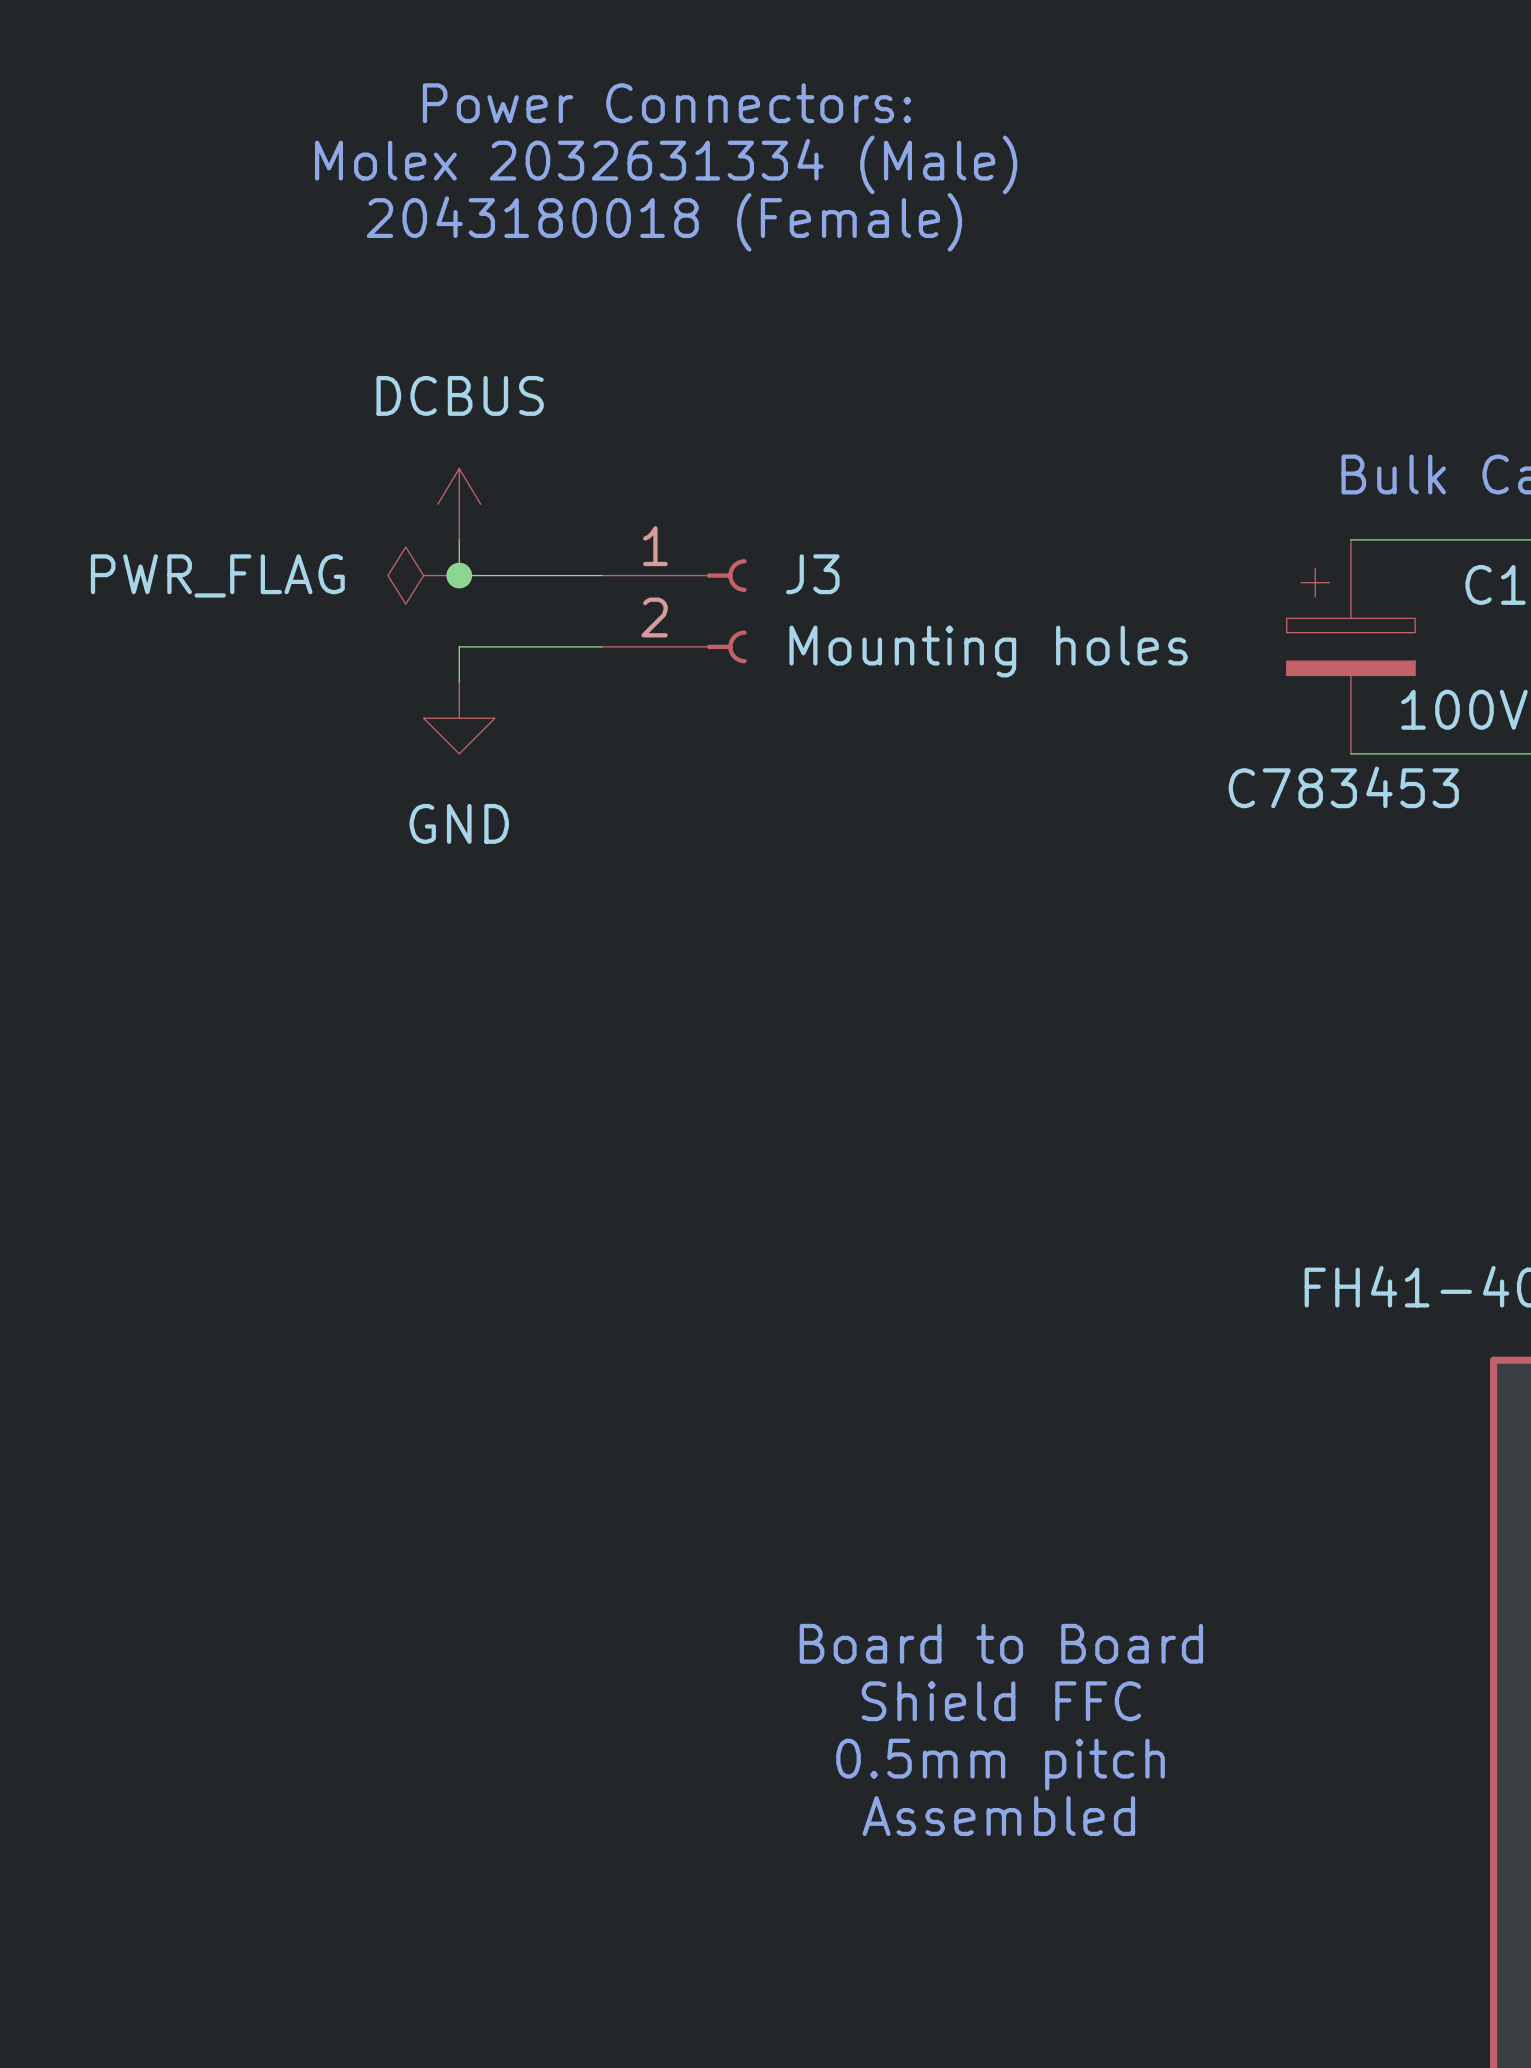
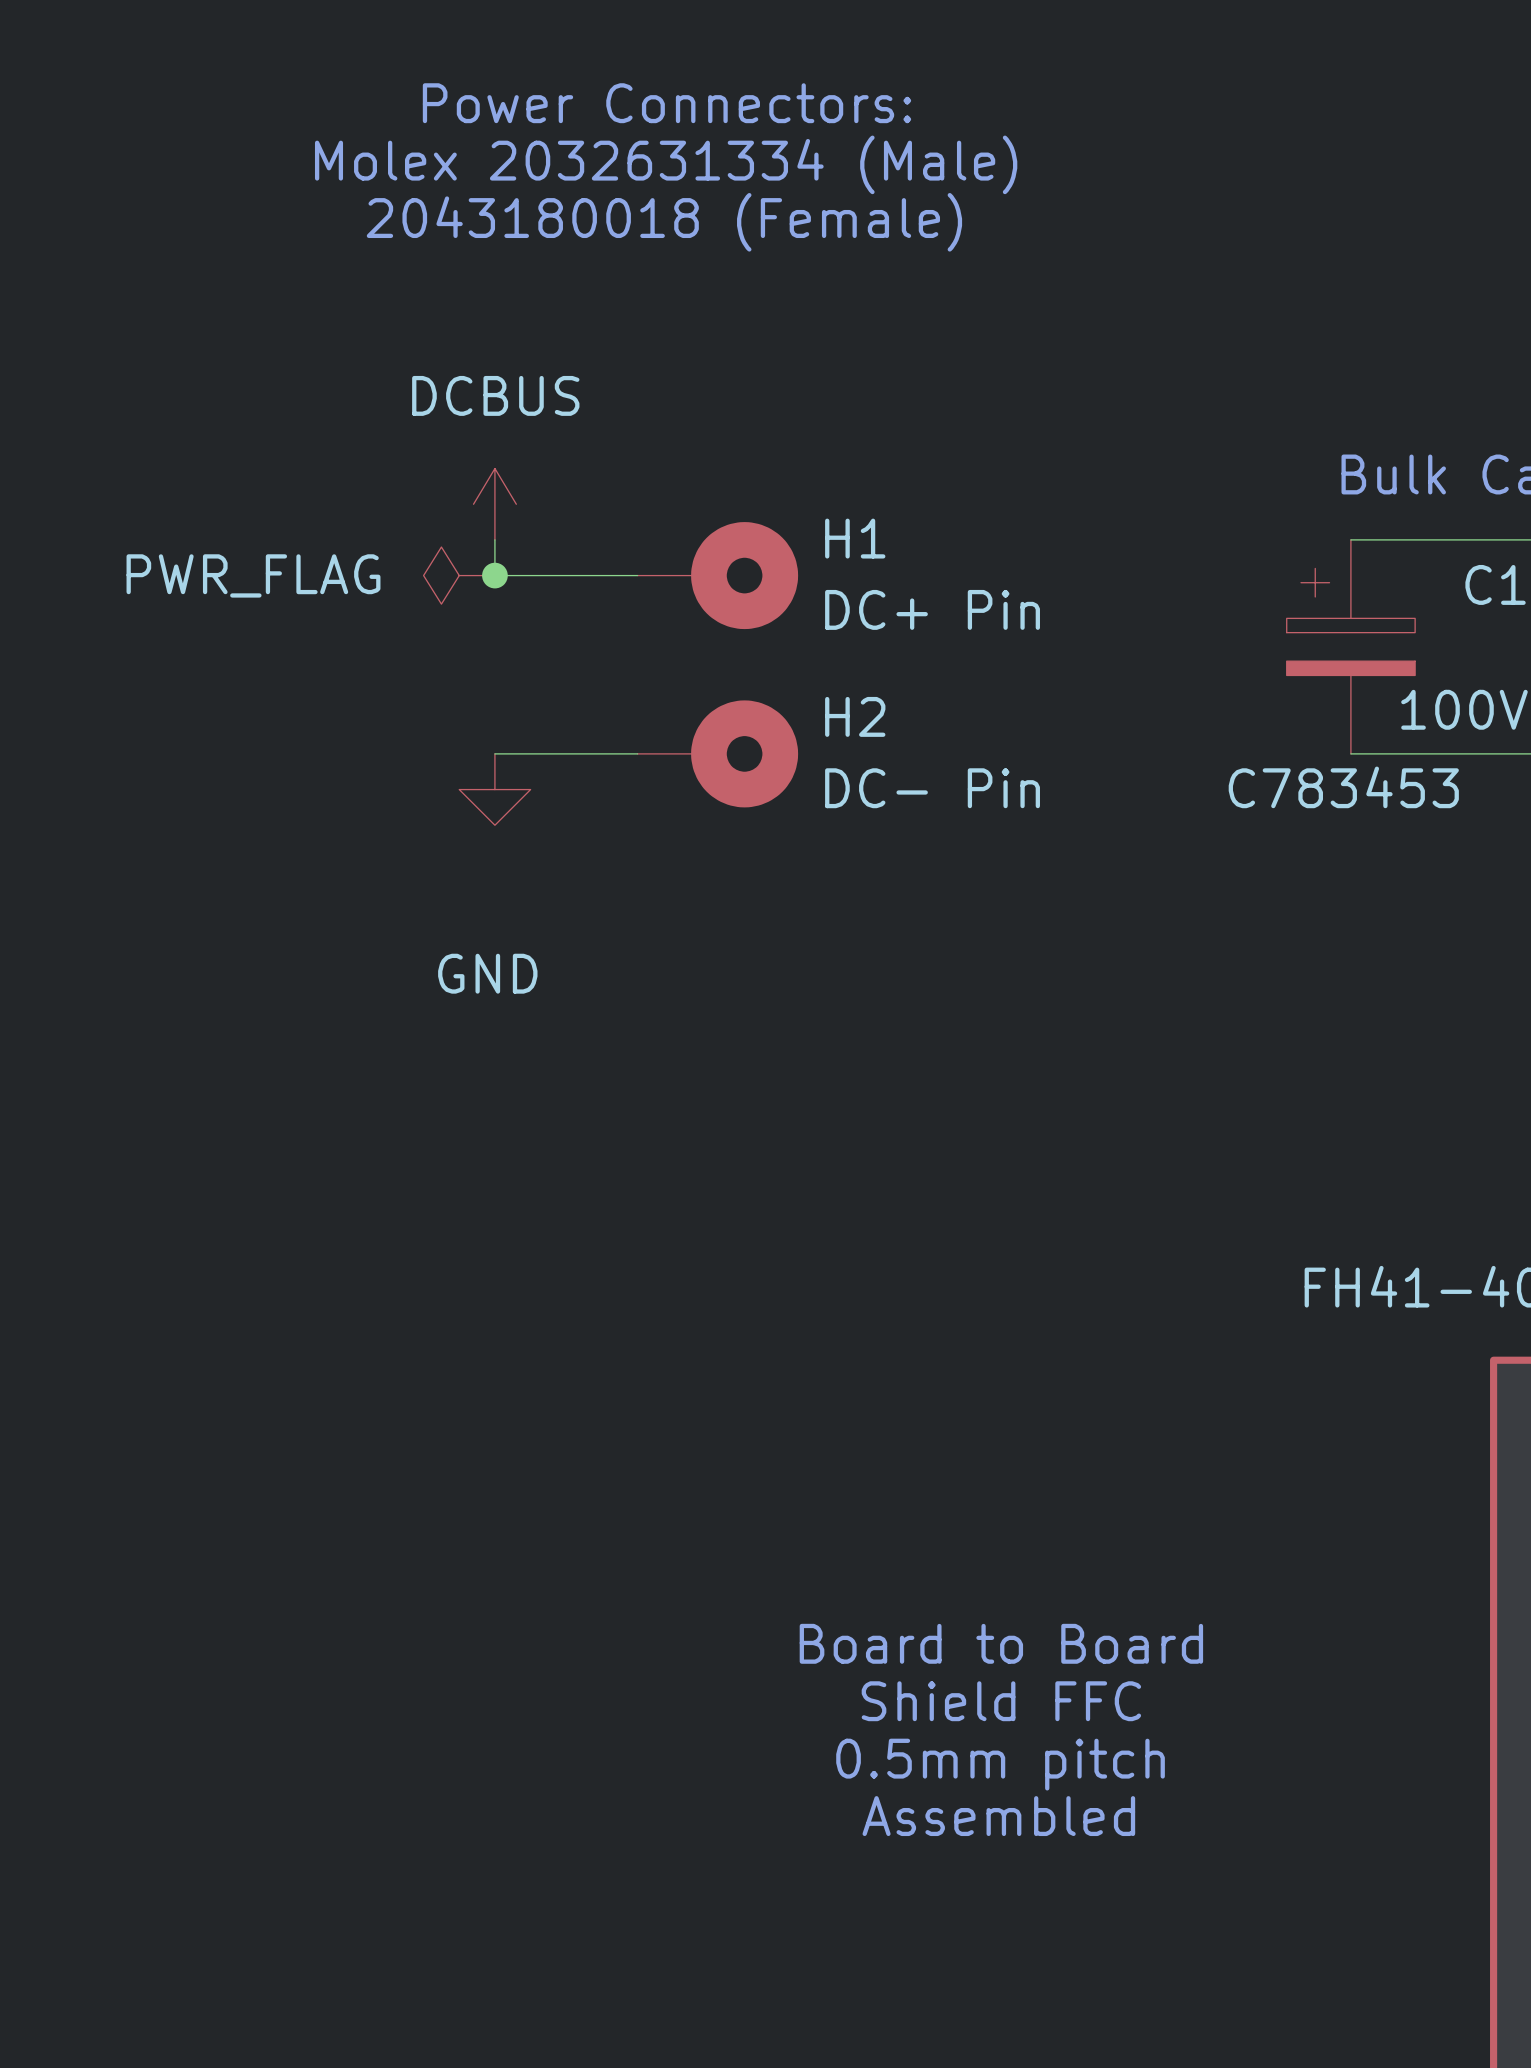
power symbol position: DCBUS (459, 504) -> DCBUS (494, 504)
wire: (459, 539) (459, 575) (494, 575) -> (494, 539) (494, 575)
power symbol position: PWR_FLAG (423, 575) -> PWR_FLAG (459, 575)
junction position: (459, 575) -> (494, 575)
H1: none -> DC+ Pin (717, 575)
J3: Mounting holes (674, 611) -> none
wire: (601, 646) (459, 646) (459, 682) -> none
power symbol position: GND (459, 718) -> GND (494, 789)
wire: none -> (494, 753) (637, 753)
H2: none -> DC- Pin (717, 753)
power symbol text position: GND (459, 823) -> GND (487, 973)

